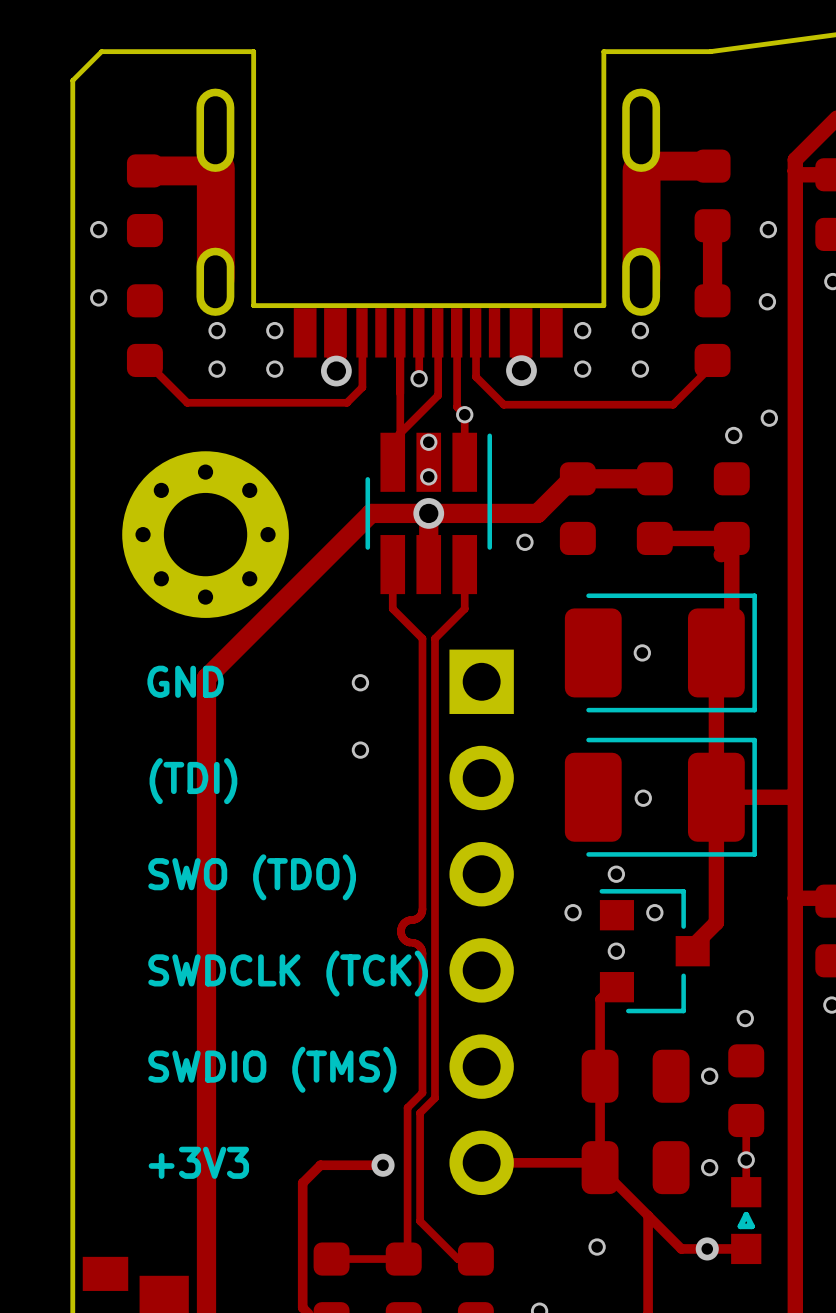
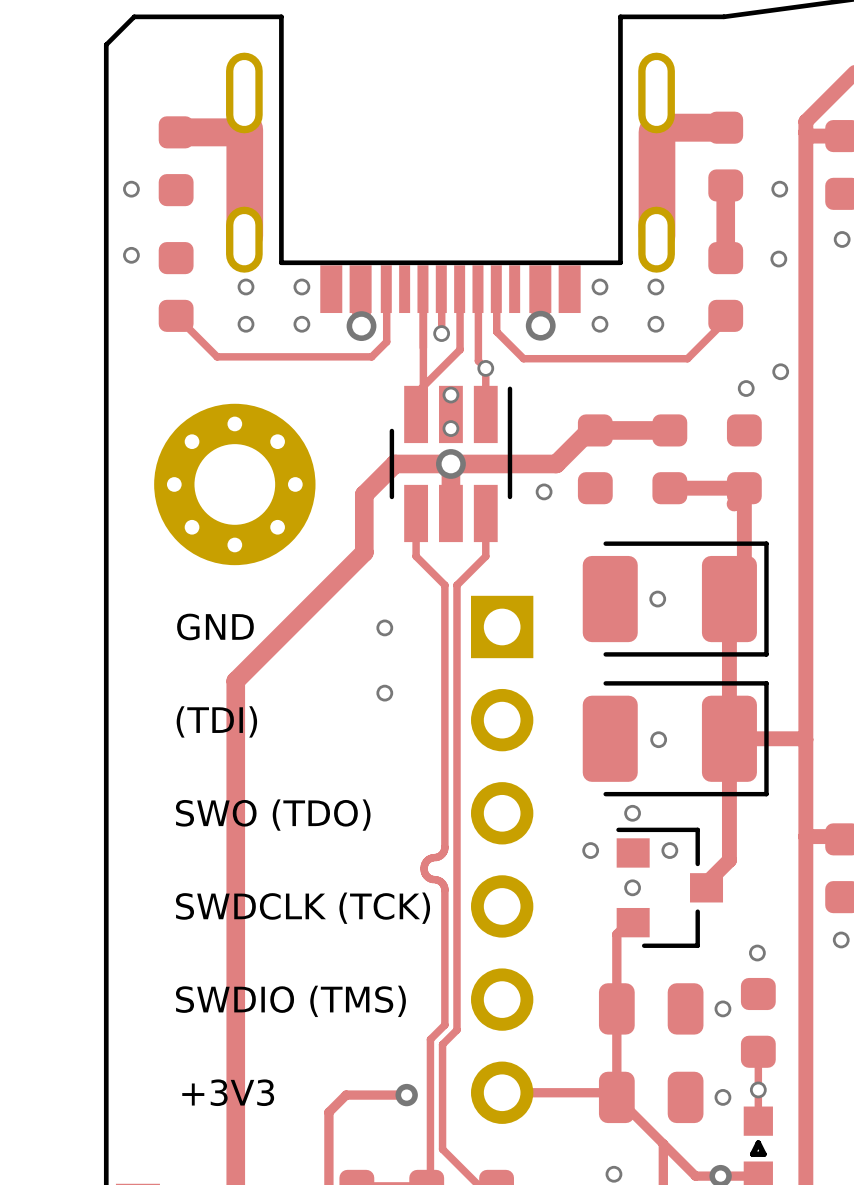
track: (339, 545) (206, 677) (206, 737) -> (364, 494) (364, 552) (235, 681)

